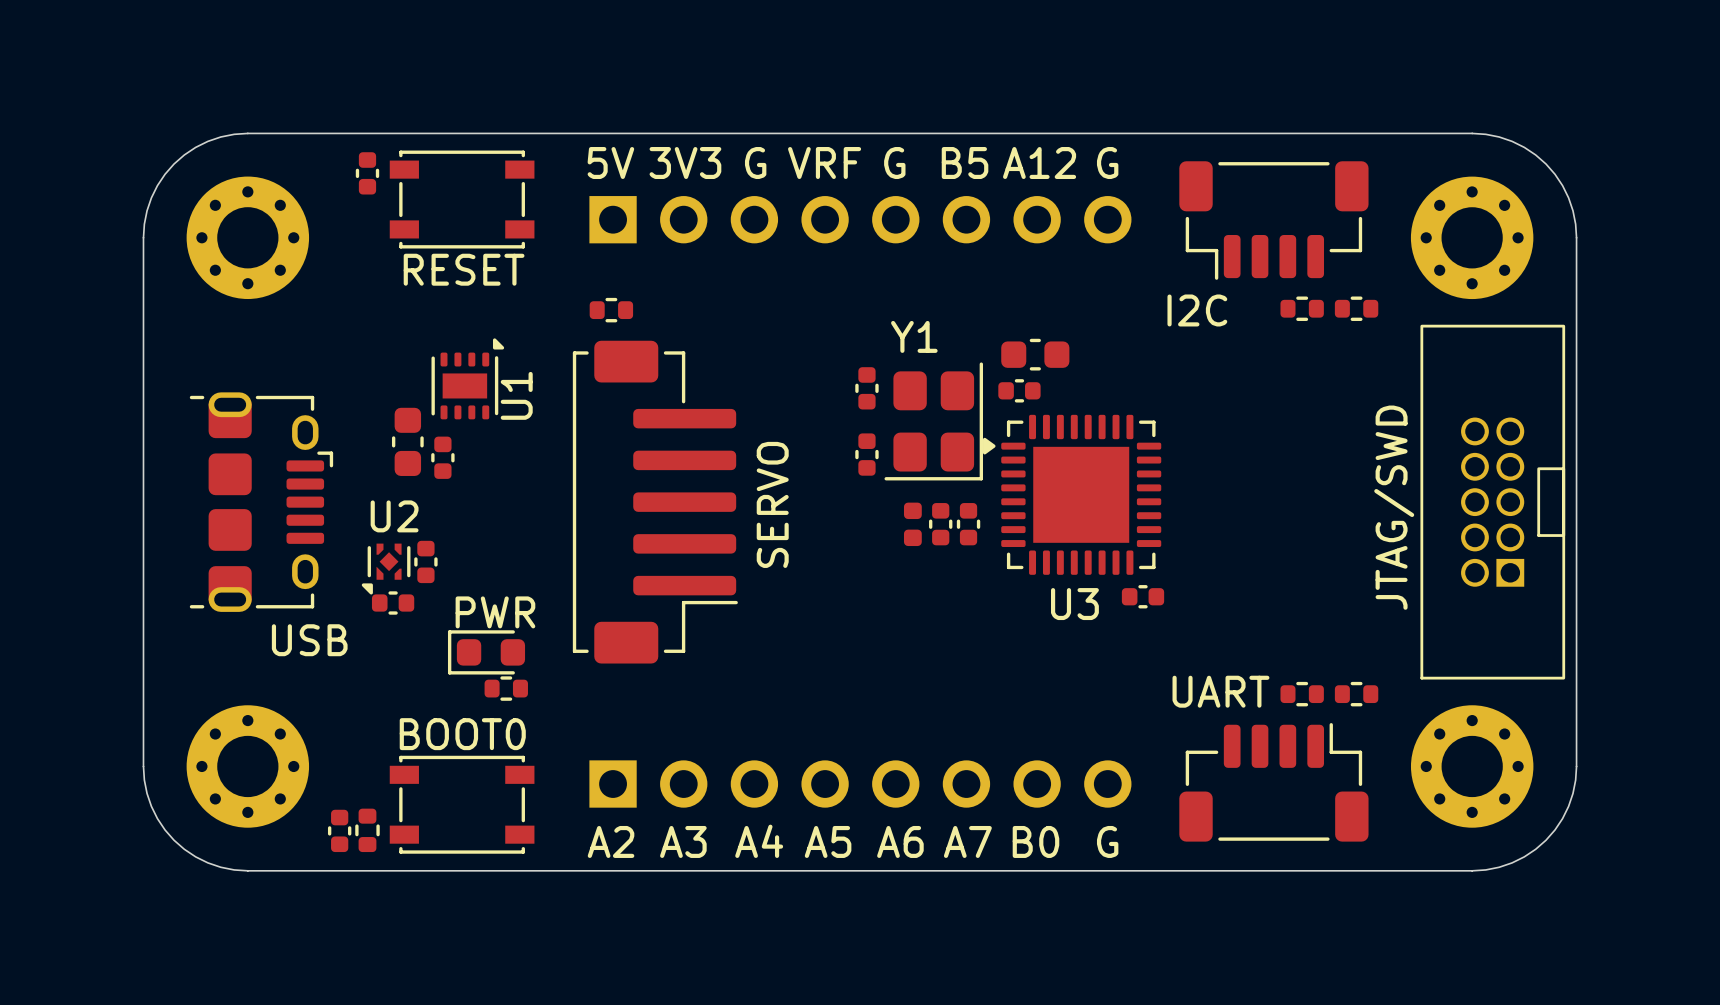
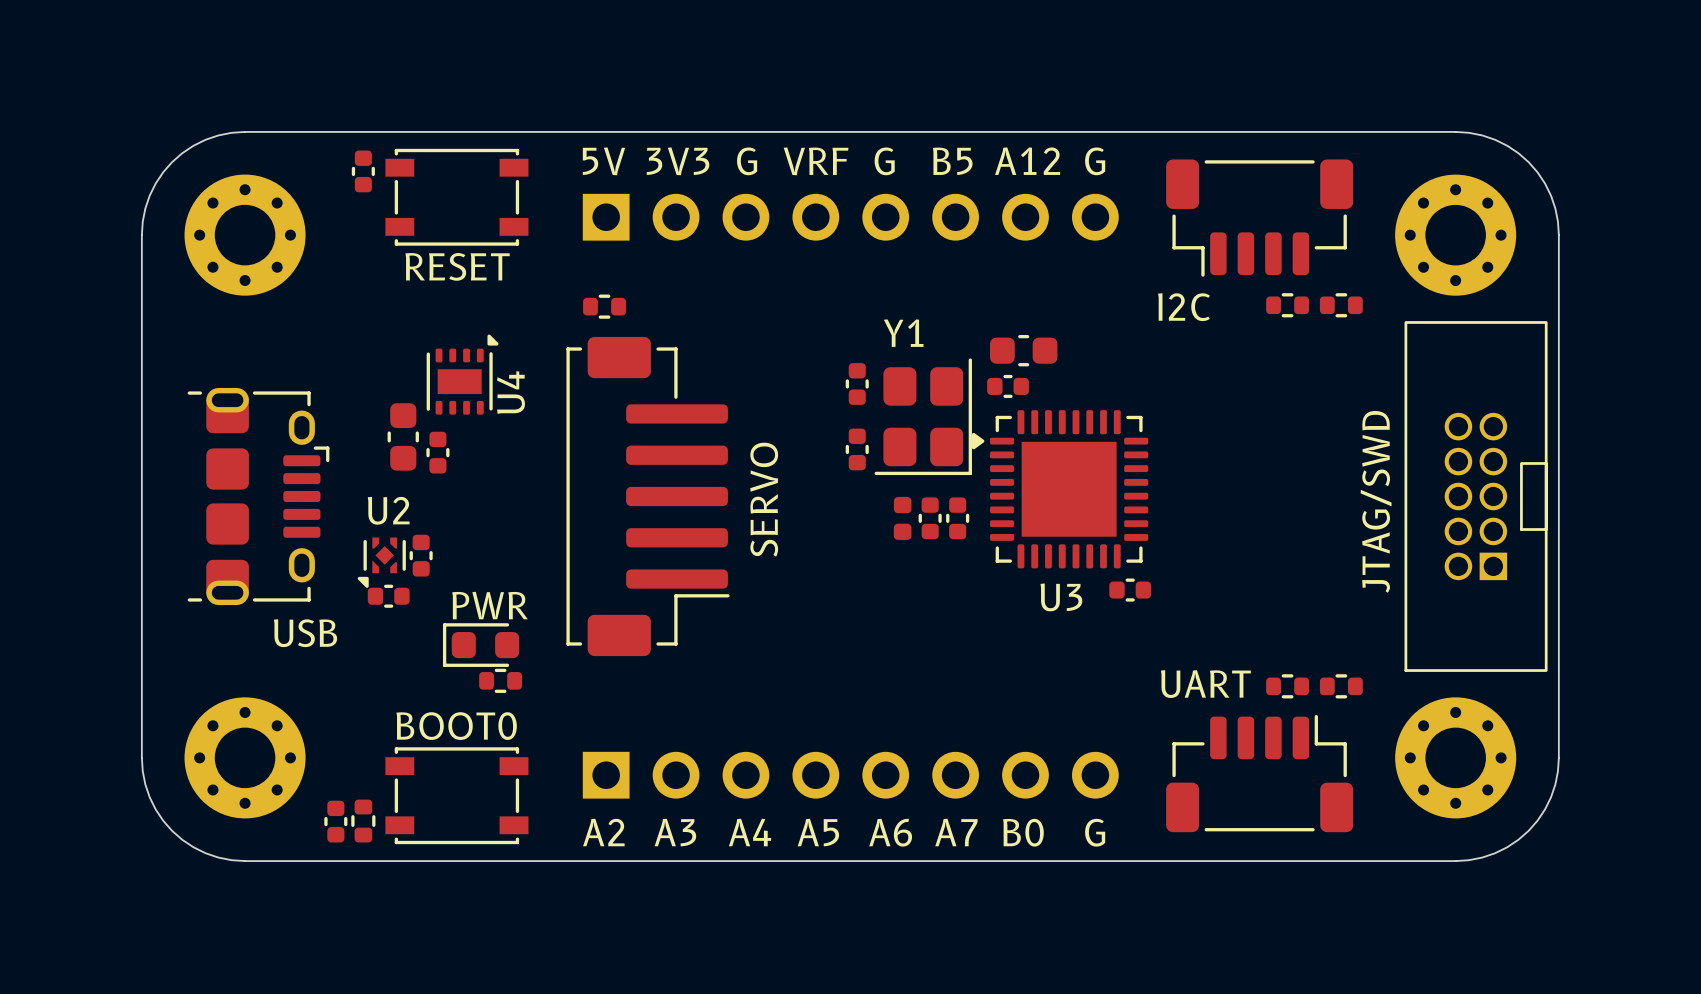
U1 name: U1 (516, 395) -> U4 (511, 392)

